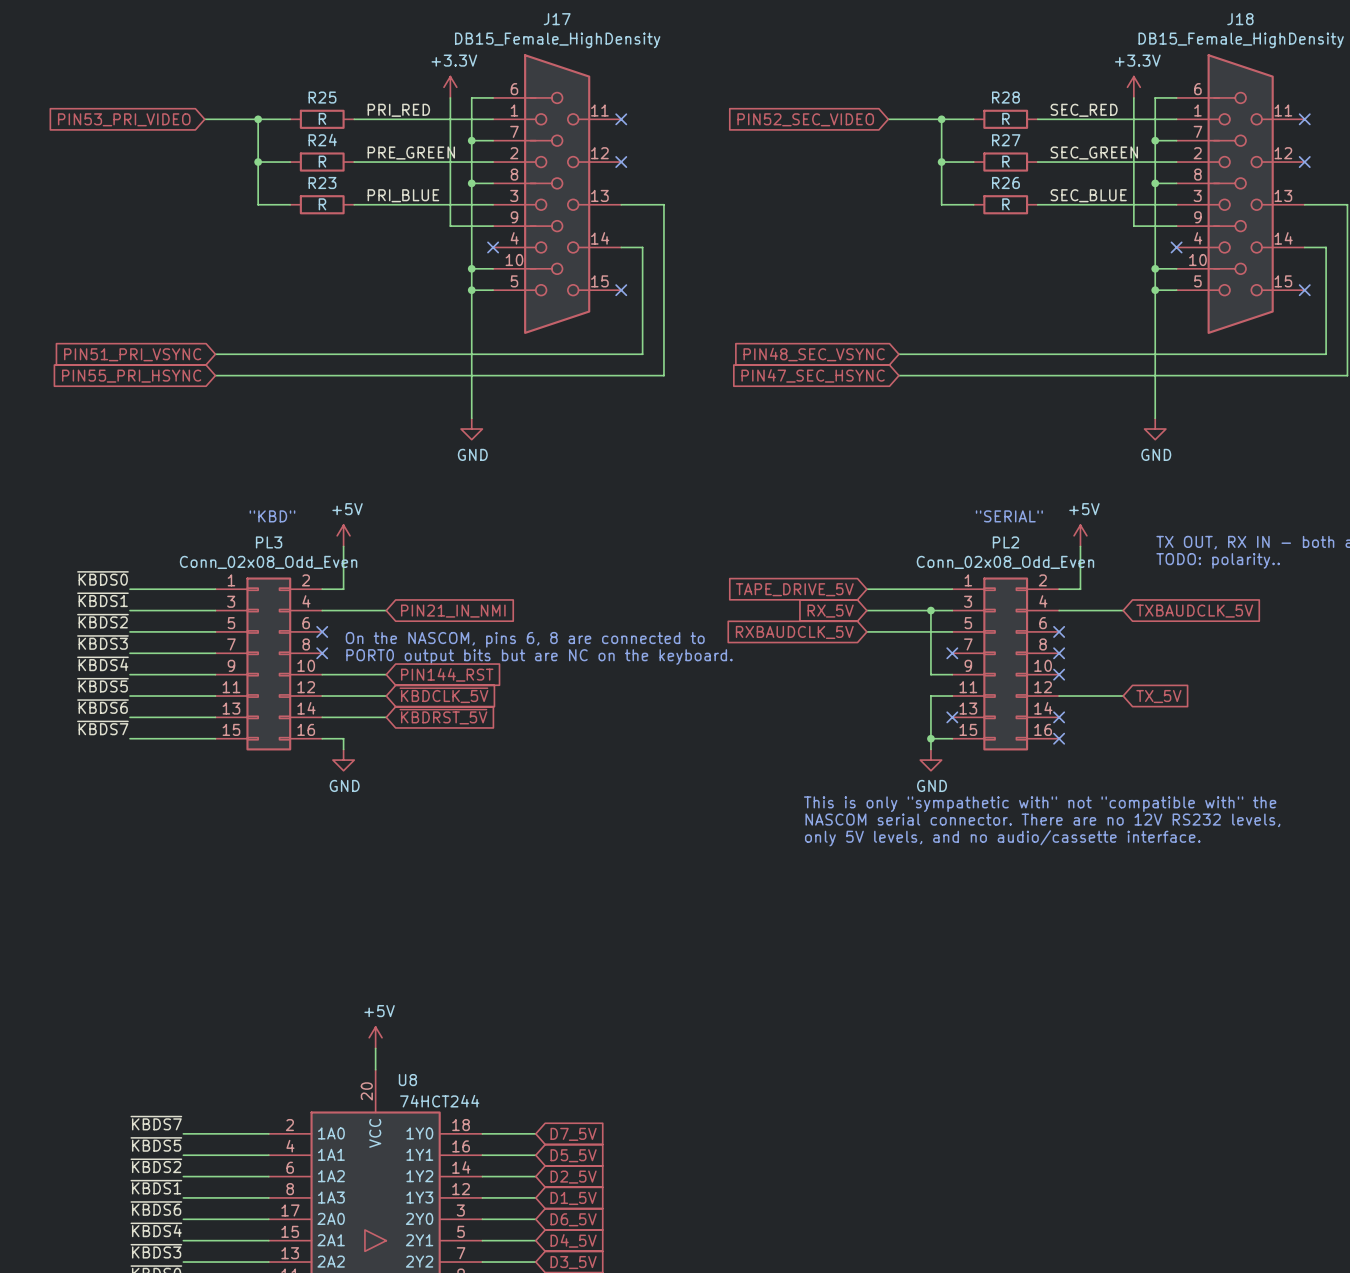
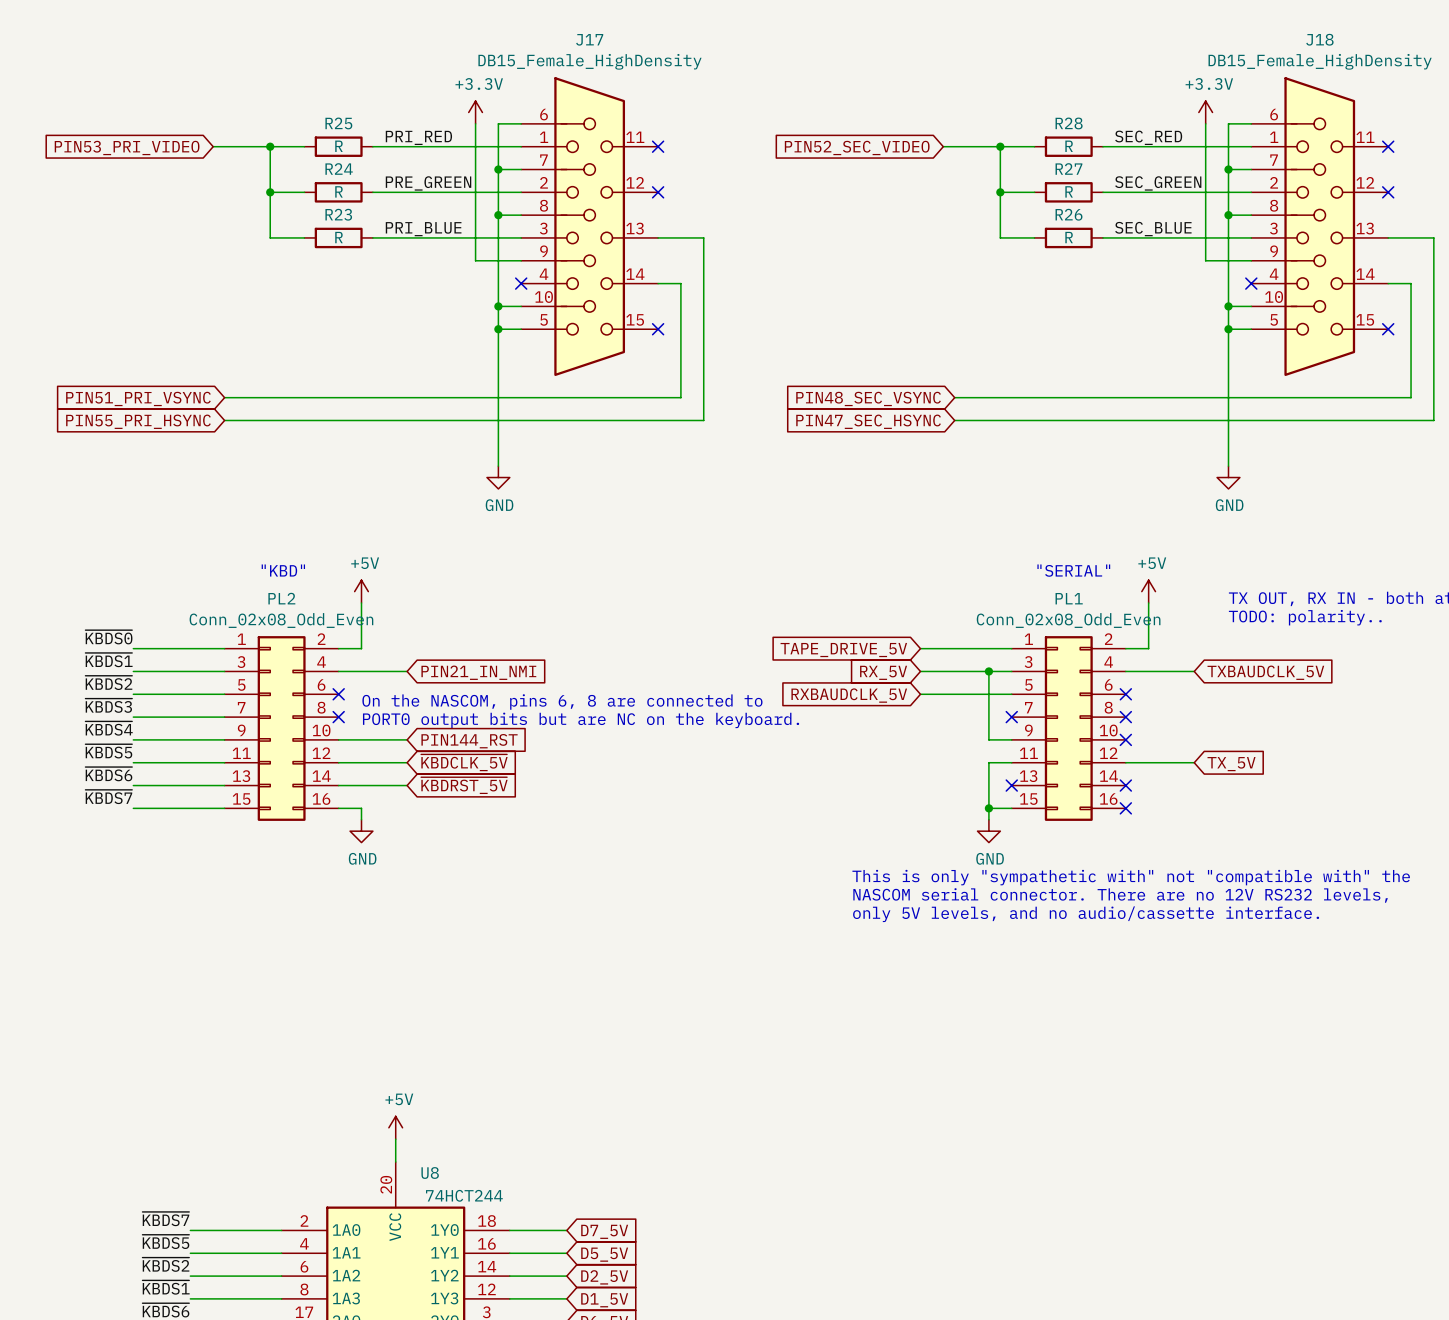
PL3 name: PL3 (269, 542) -> PL2 (281, 598)
PL2 name: PL2 (1005, 542) -> PL1 (1069, 598)

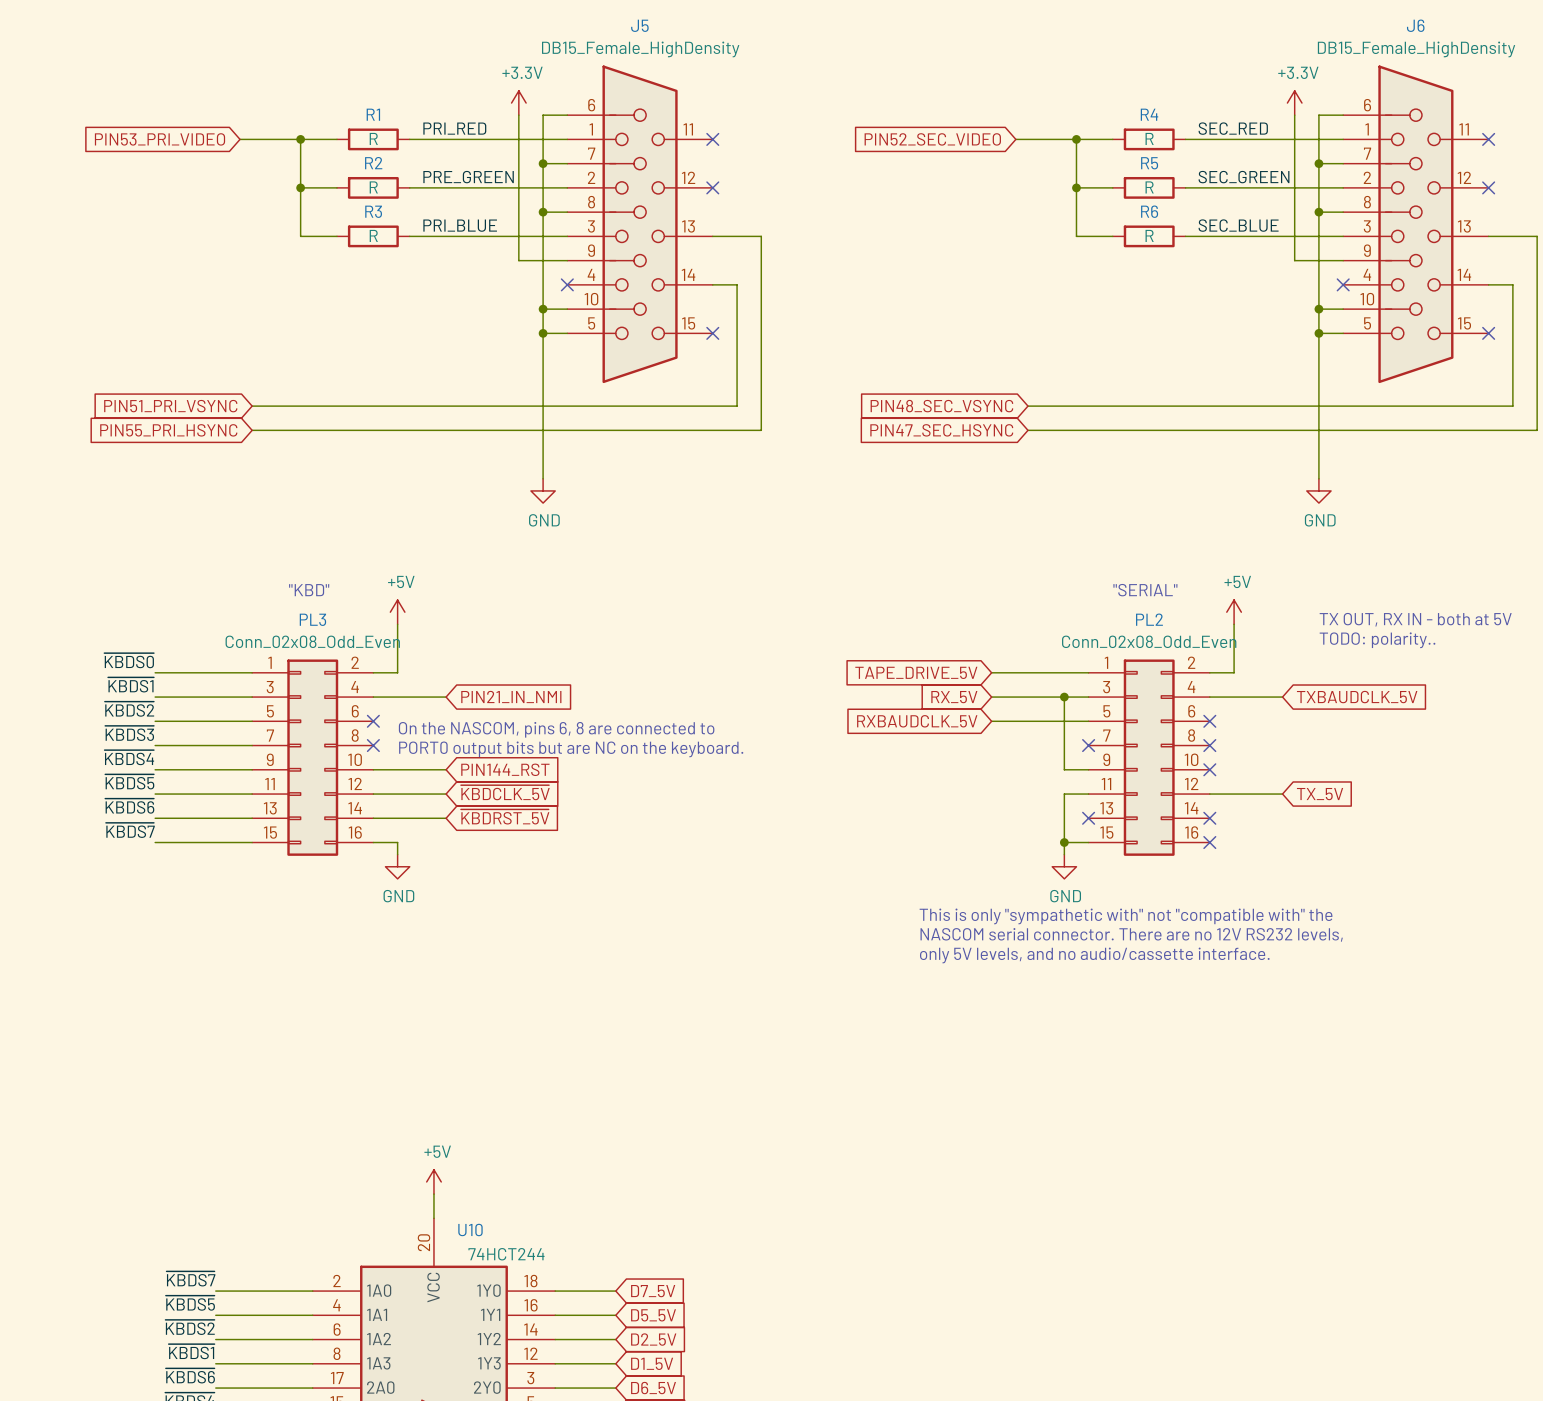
J17 name: J17 (589, 39) -> J5 (639, 25)
J18 name: J18 (1319, 39) -> J6 (1415, 25)
R25 name: R25 (338, 123) -> R1 (373, 114)
R28 name: R28 (1069, 123) -> R4 (1149, 114)
R24 name: R24 (339, 168) -> R2 (373, 163)
R27 name: R27 (1068, 168) -> R5 (1149, 163)
R23 name: R23 (338, 214) -> R3 (373, 211)
R26 name: R26 (1069, 214) -> R6 (1149, 211)
PL2 name: PL2 (281, 598) -> PL3 (312, 619)
PL1 name: PL1 (1069, 598) -> PL2 (1149, 619)
U8 name: U8 (430, 1172) -> U10 (470, 1230)

